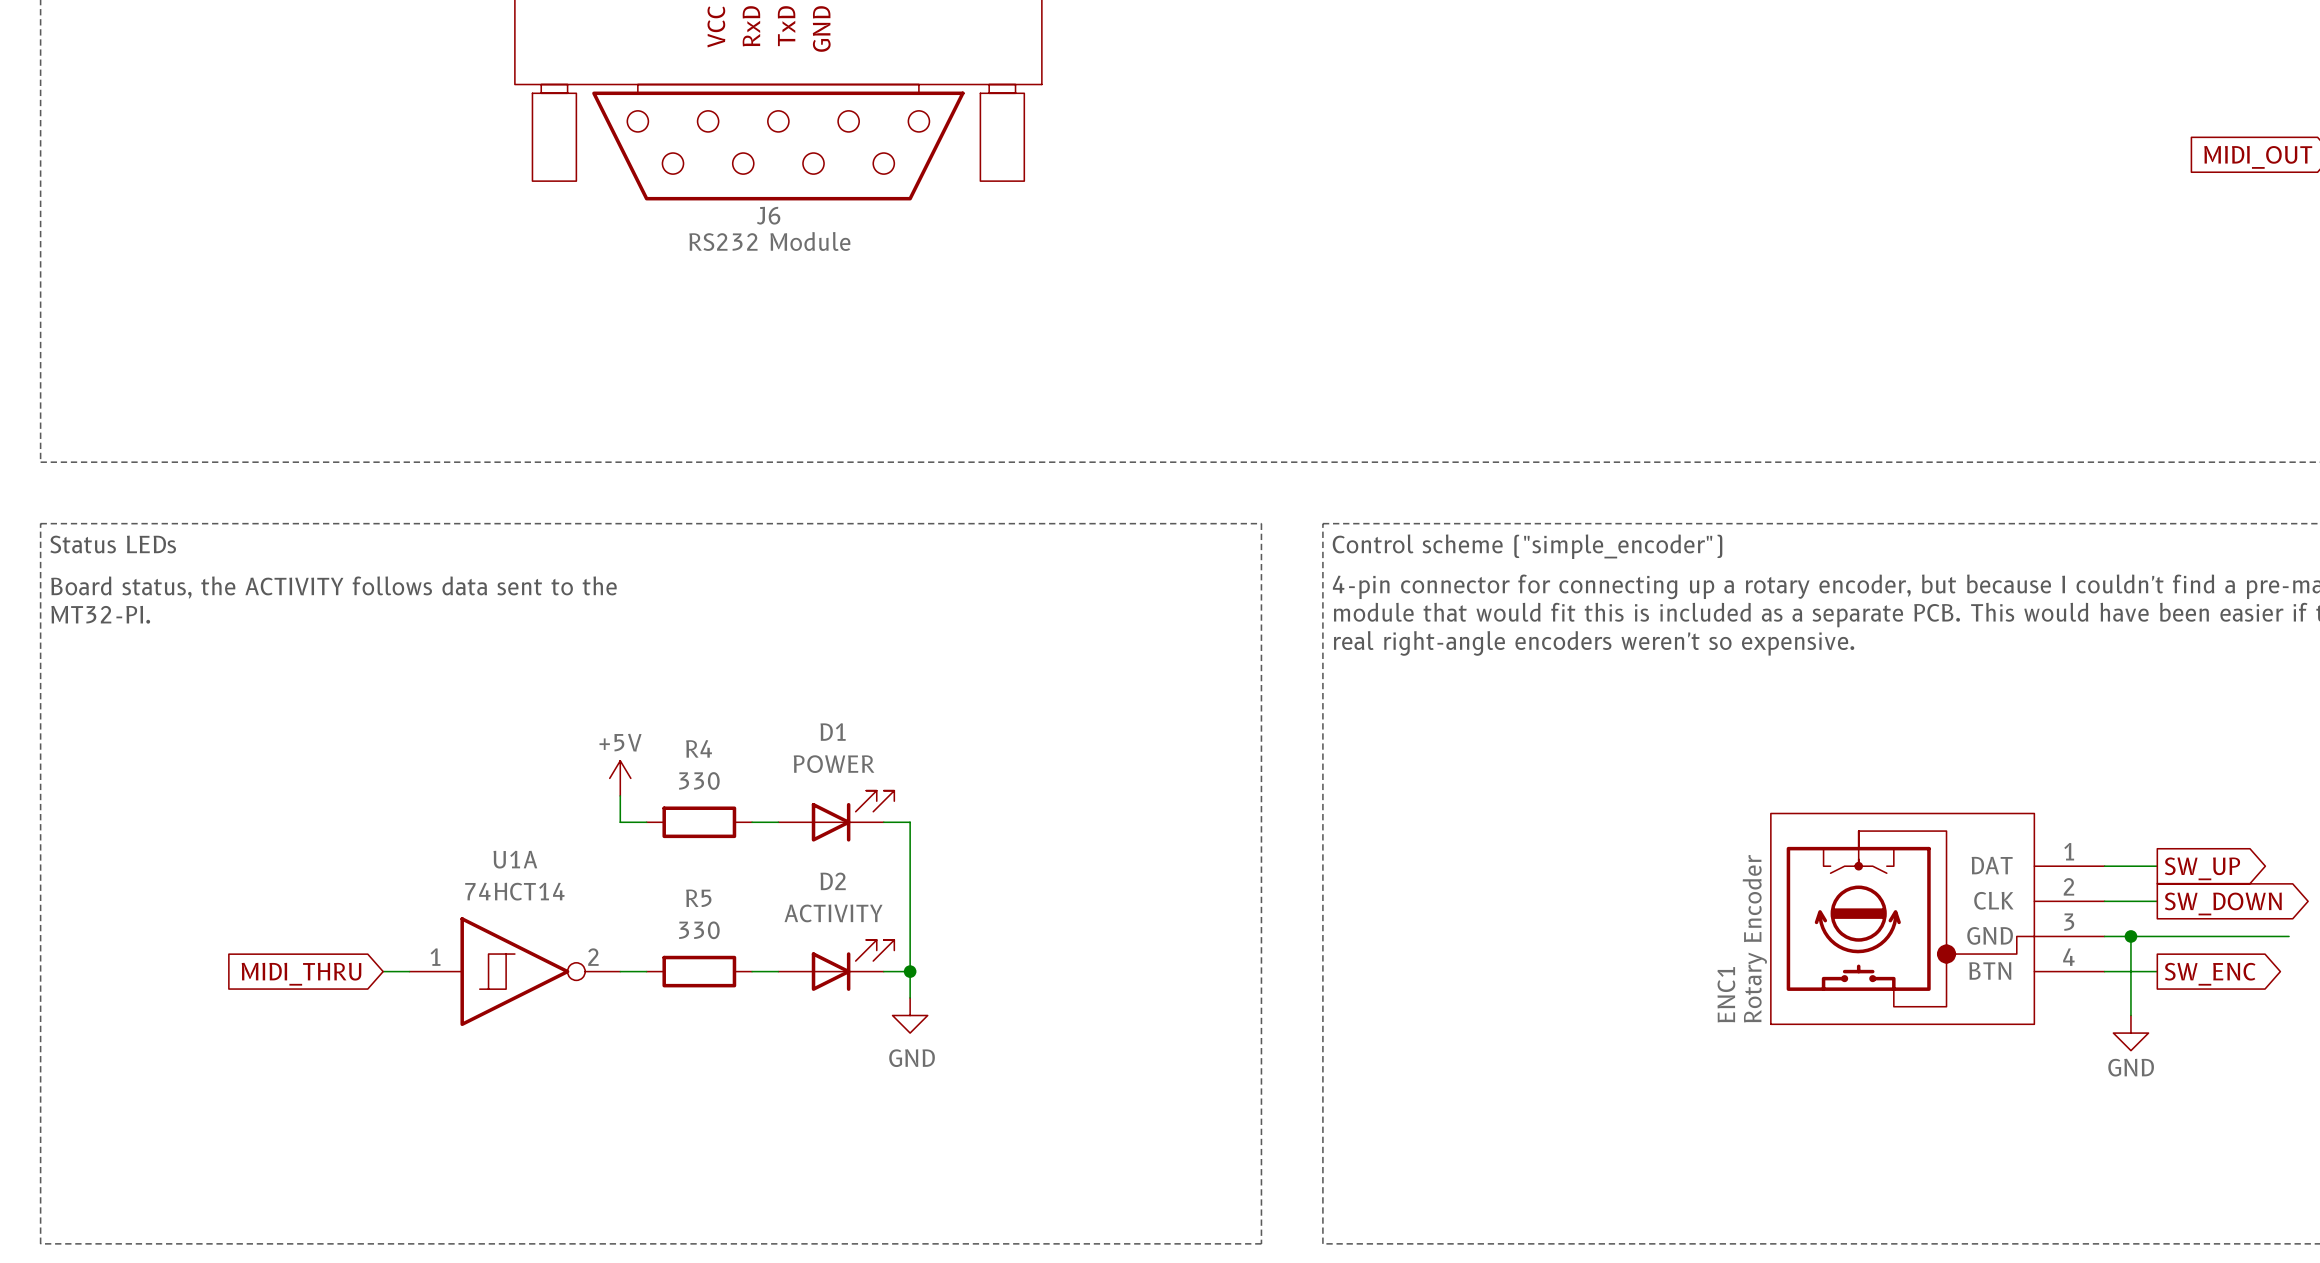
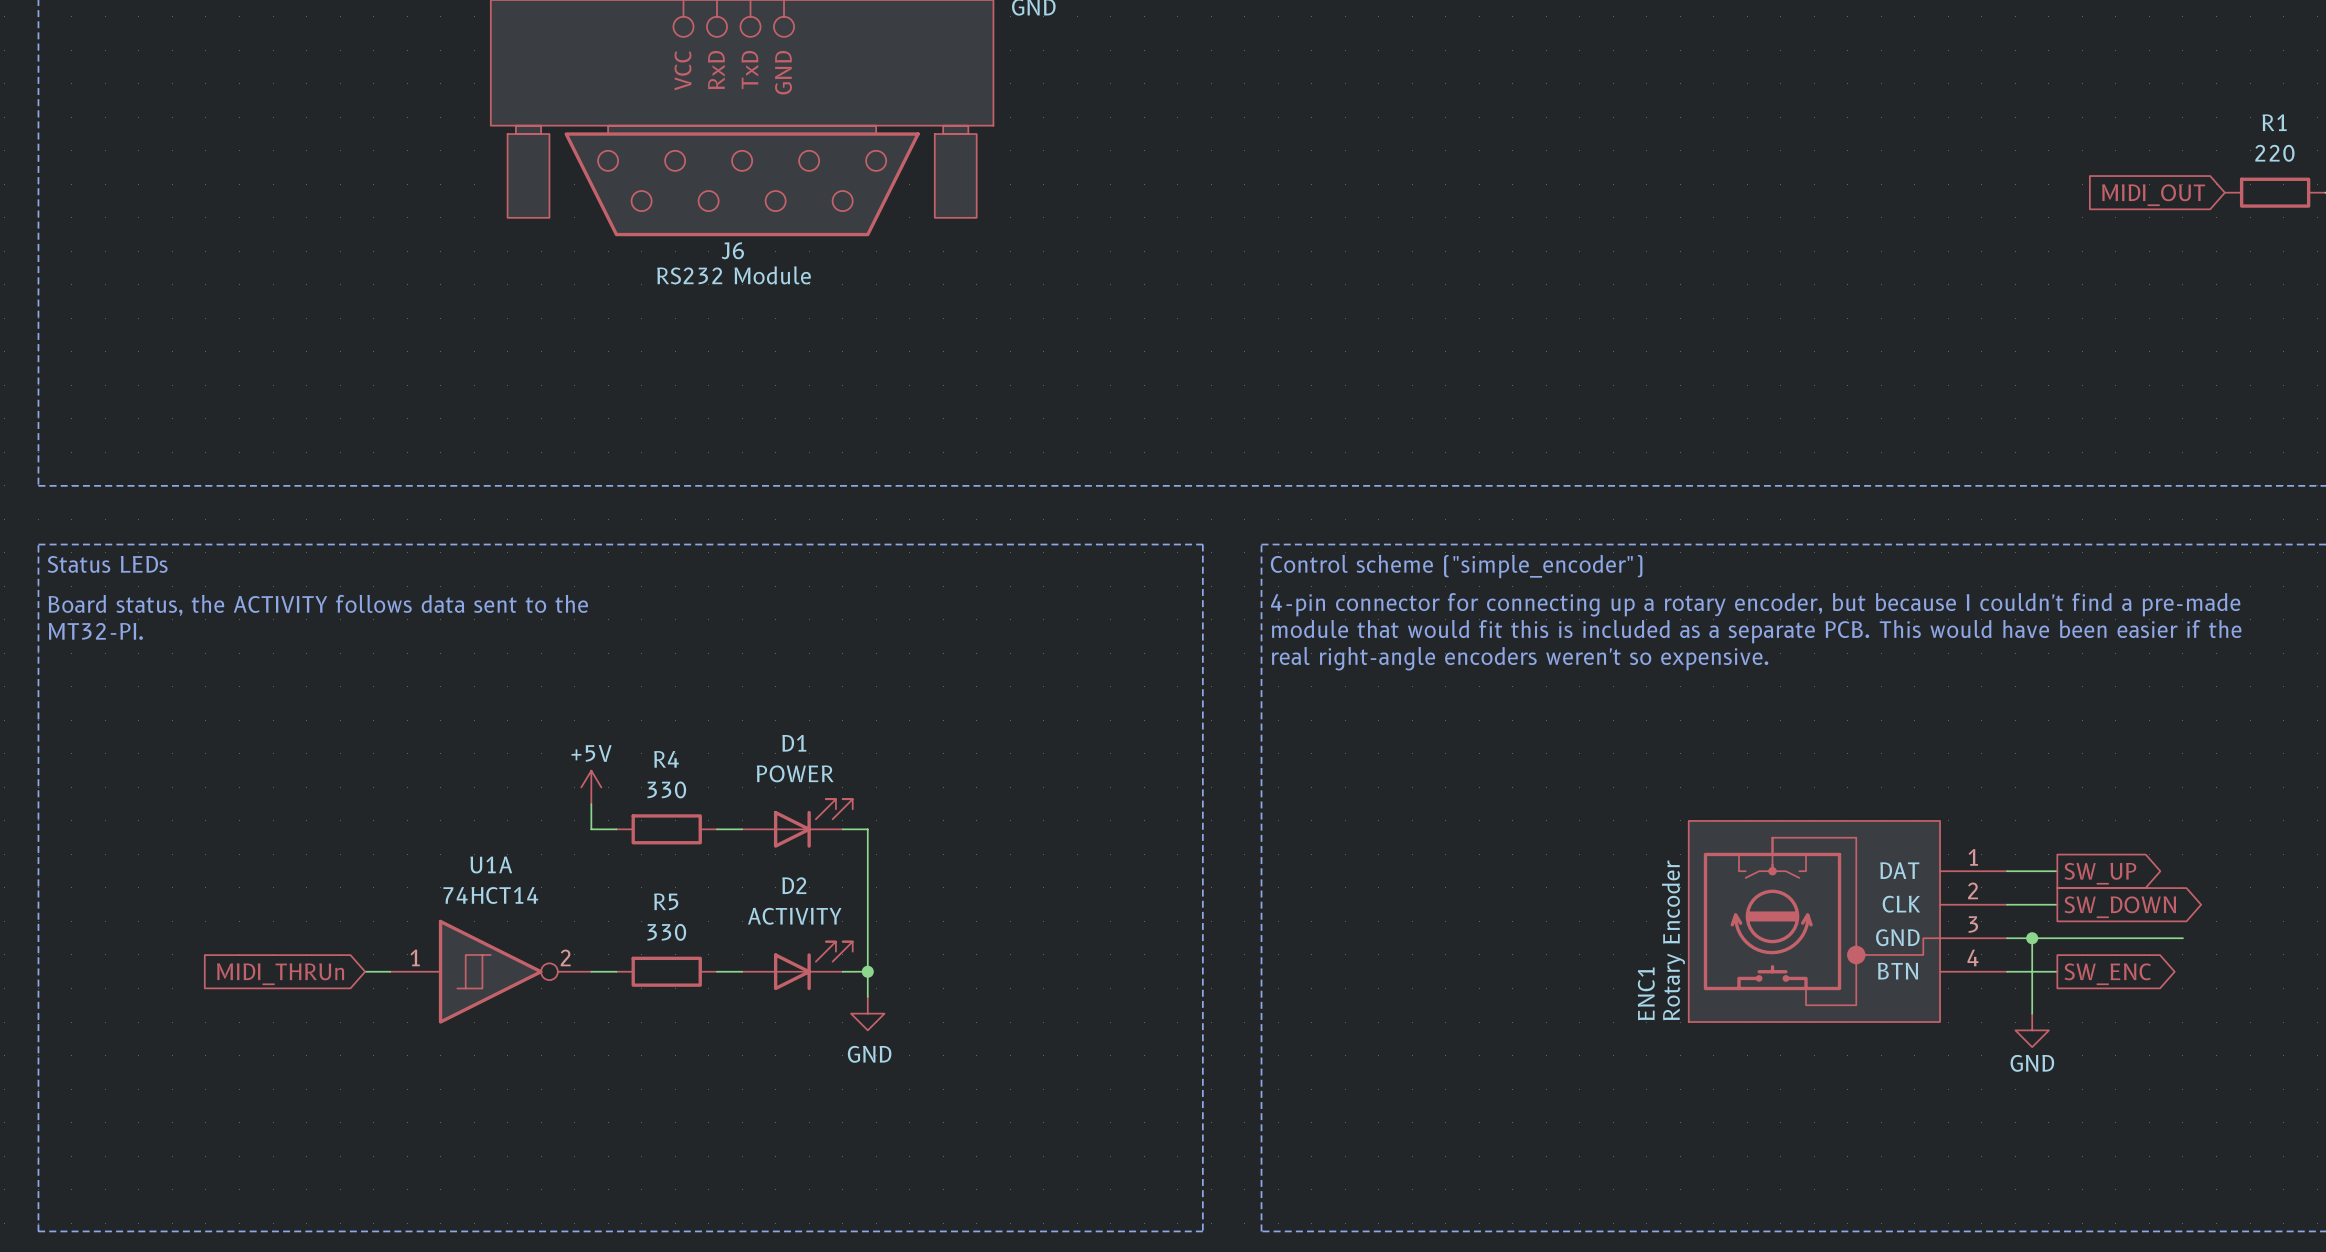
global label: MIDI_THRU (301, 974) -> MIDI_THRUn (280, 974)

